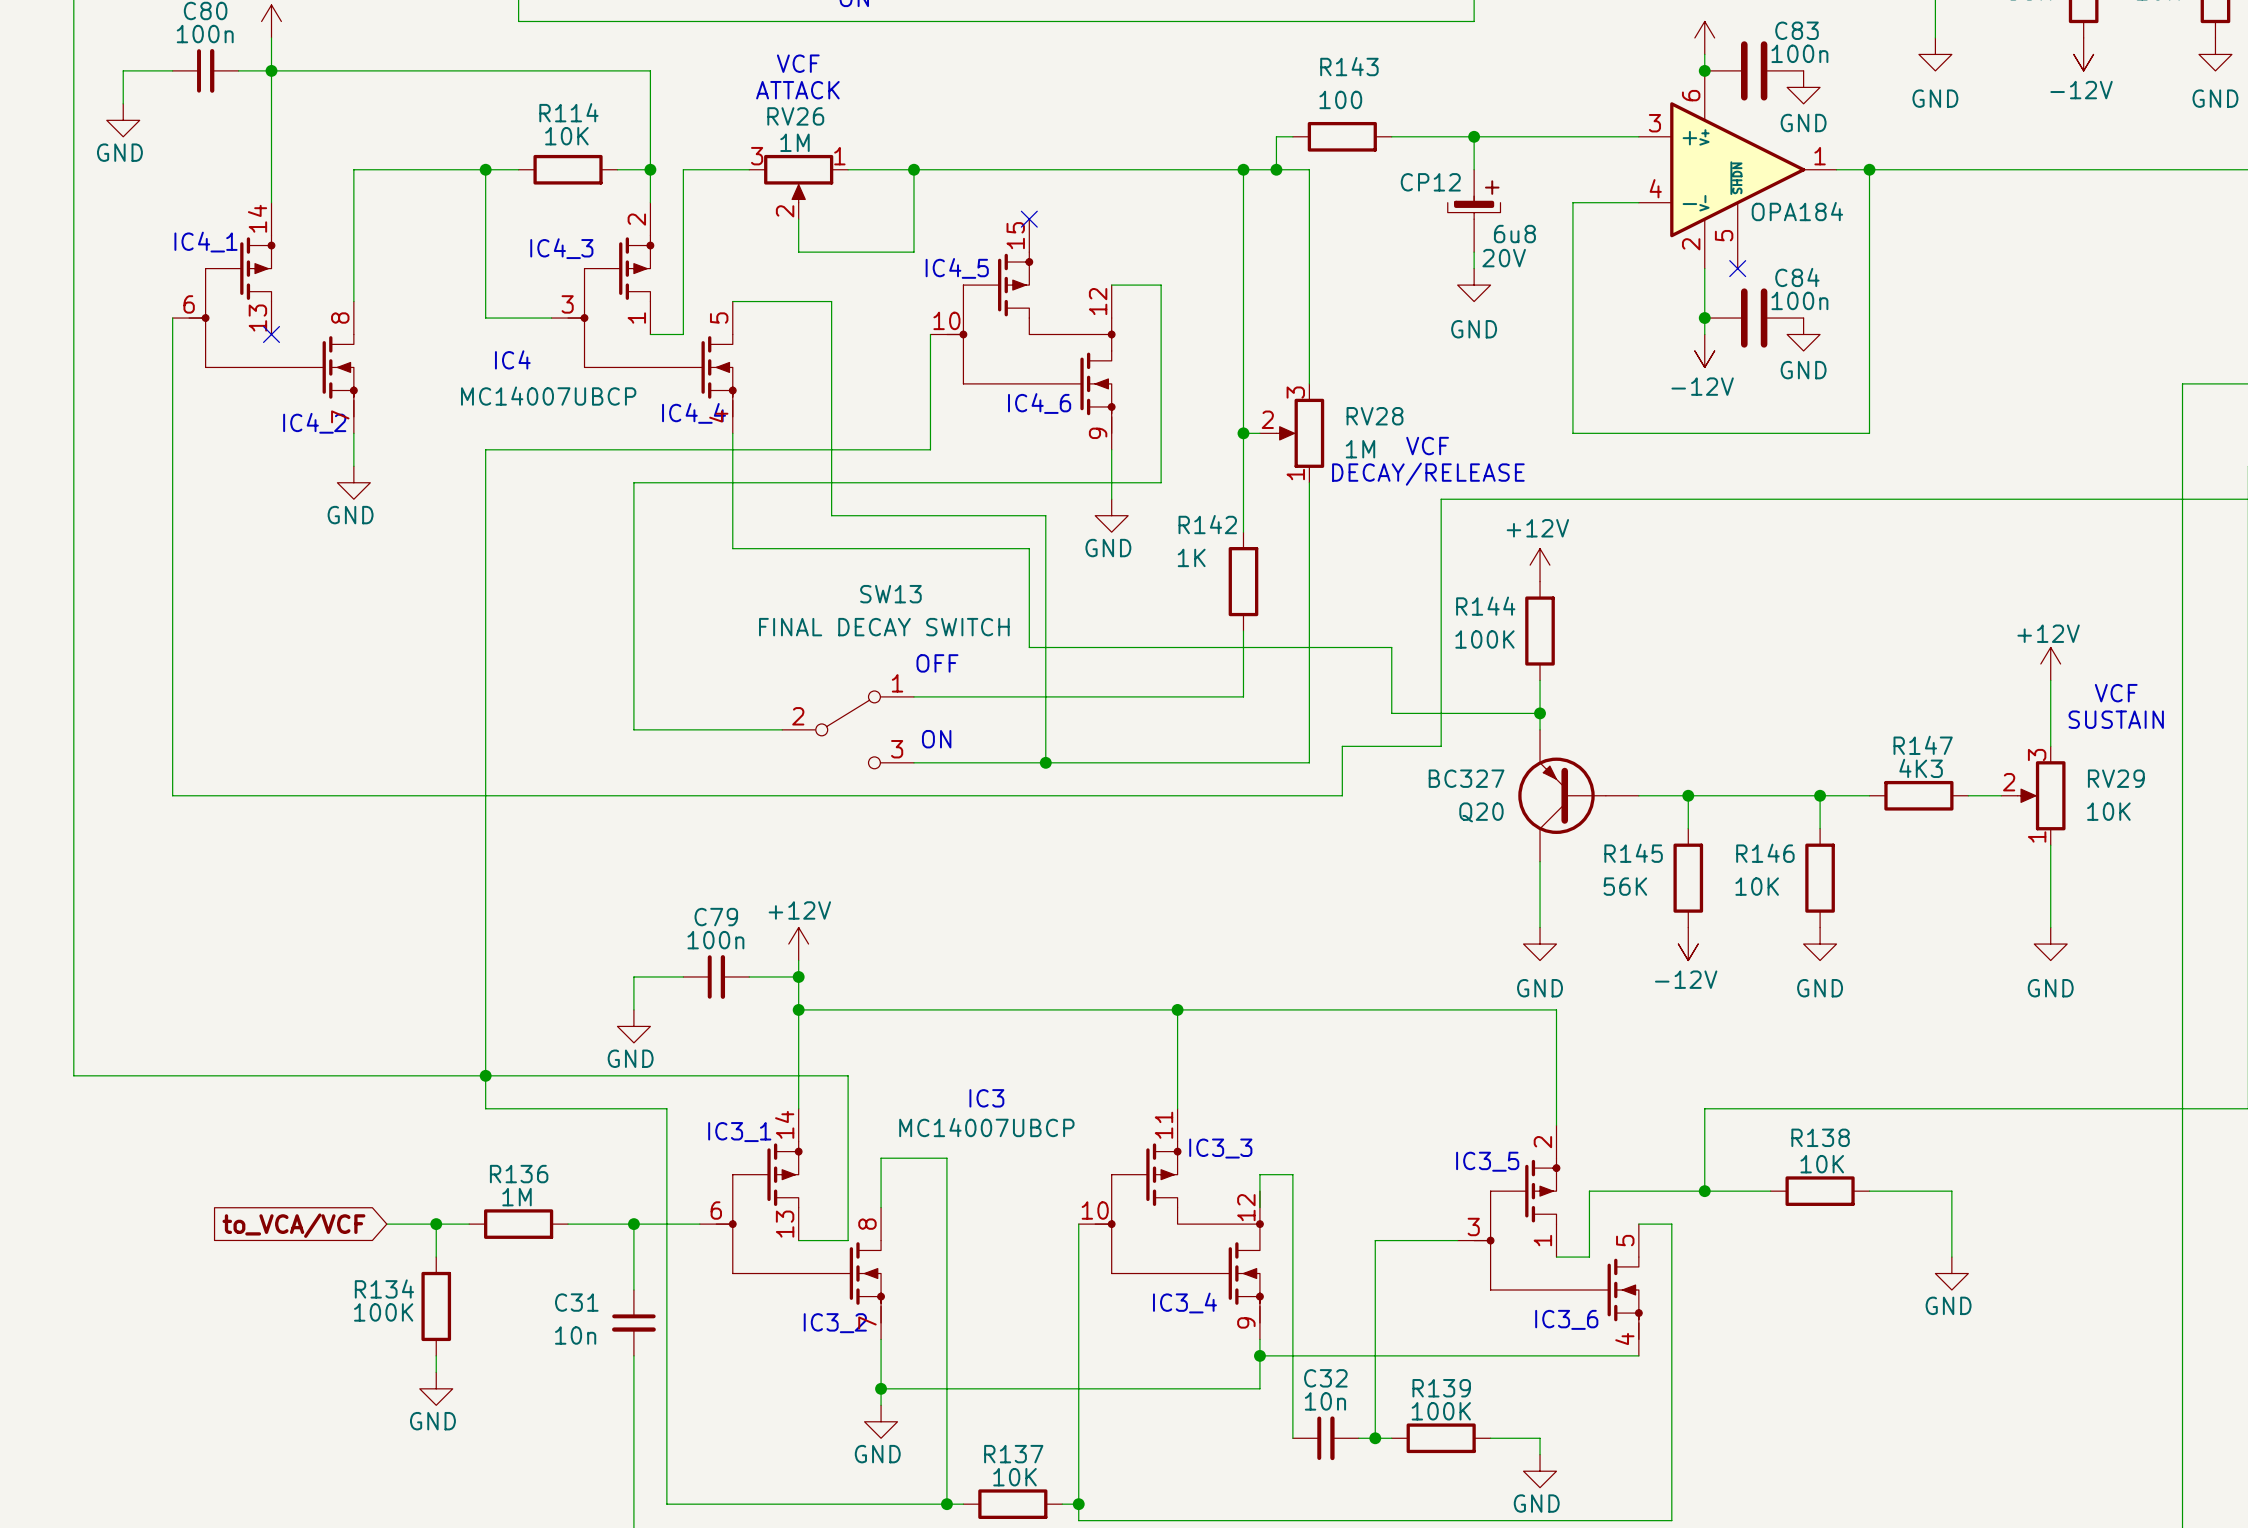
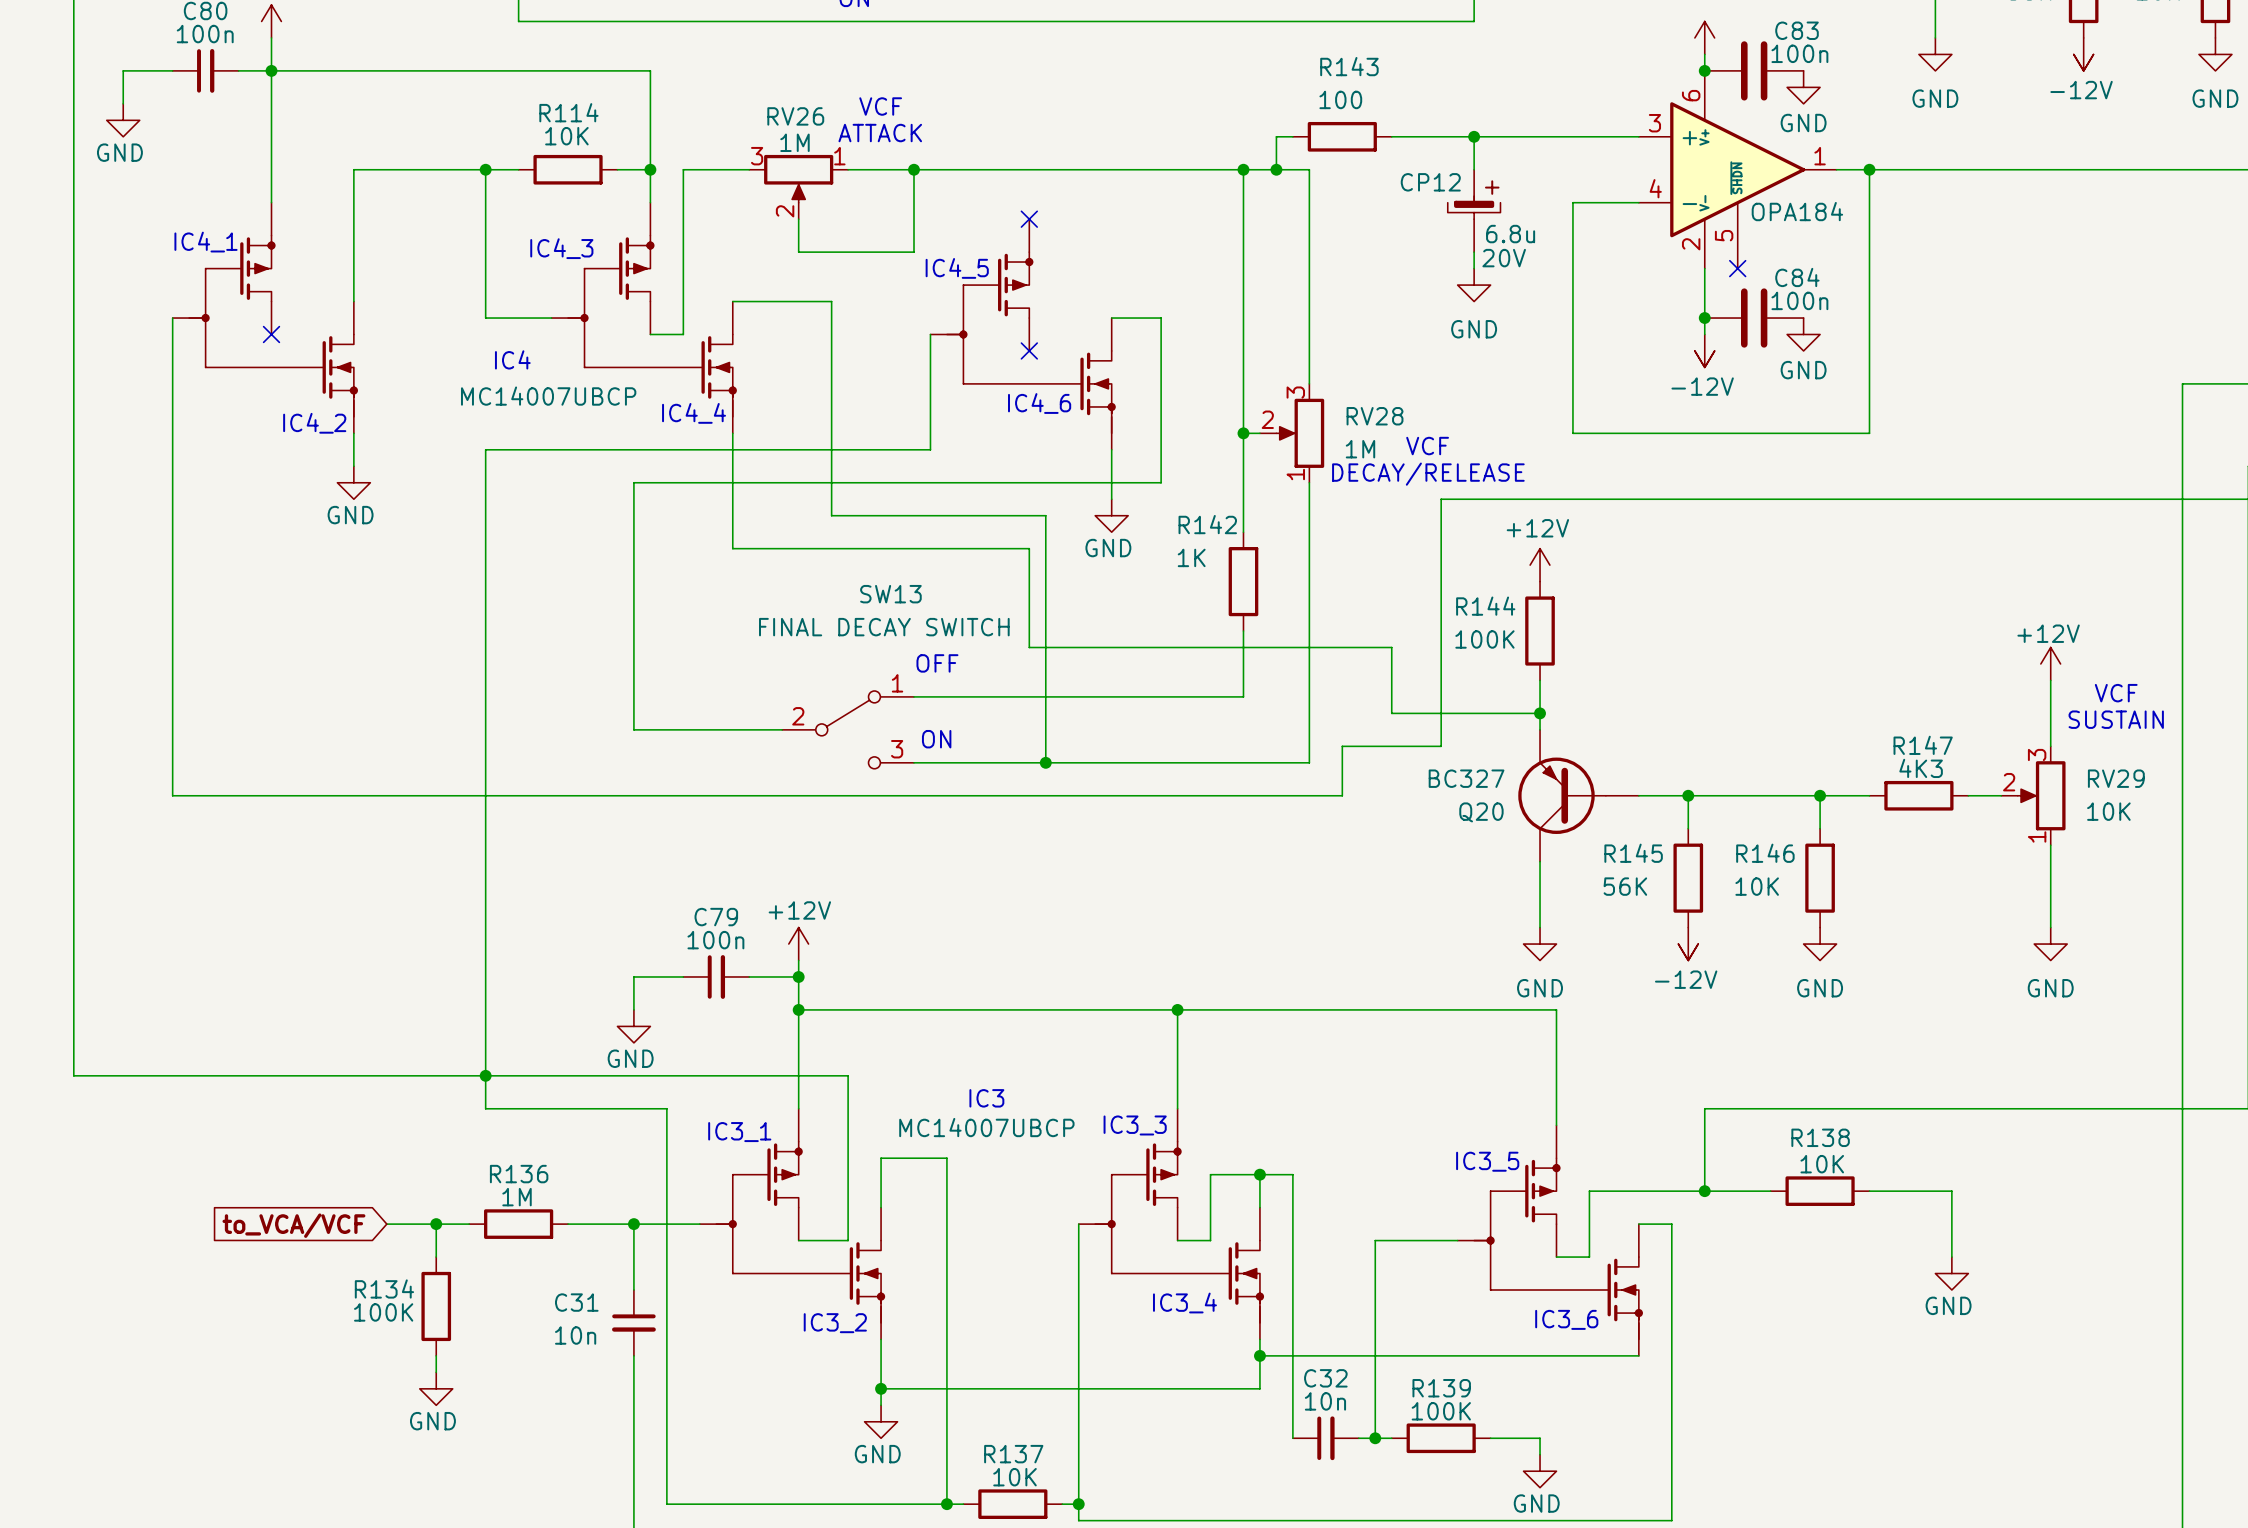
text position: VCF (798, 63) -> VCF (880, 106)
text position: ATTACK (797, 90) -> ATTACK (880, 133)
part symbol: [172, 202, 1115, 450] -> [172, 202, 1115, 450]
CP12 value: 6u8 (1514, 234) -> 6.8u (1510, 234)
wire: (1111, 285) (1161, 285) (1161, 318) -> (1111, 318) (1161, 318)
no-connect mark: none -> (1029, 350)
part symbol: [699, 1108, 1643, 1356] -> [699, 1108, 1643, 1356]
text position: IC3_3 (1220, 1148) -> IC3_3 (1135, 1125)
wire: none -> (1259, 1174) (1210, 1174) (1210, 1240) (1177, 1240)
junction: none -> (1259, 1174)

